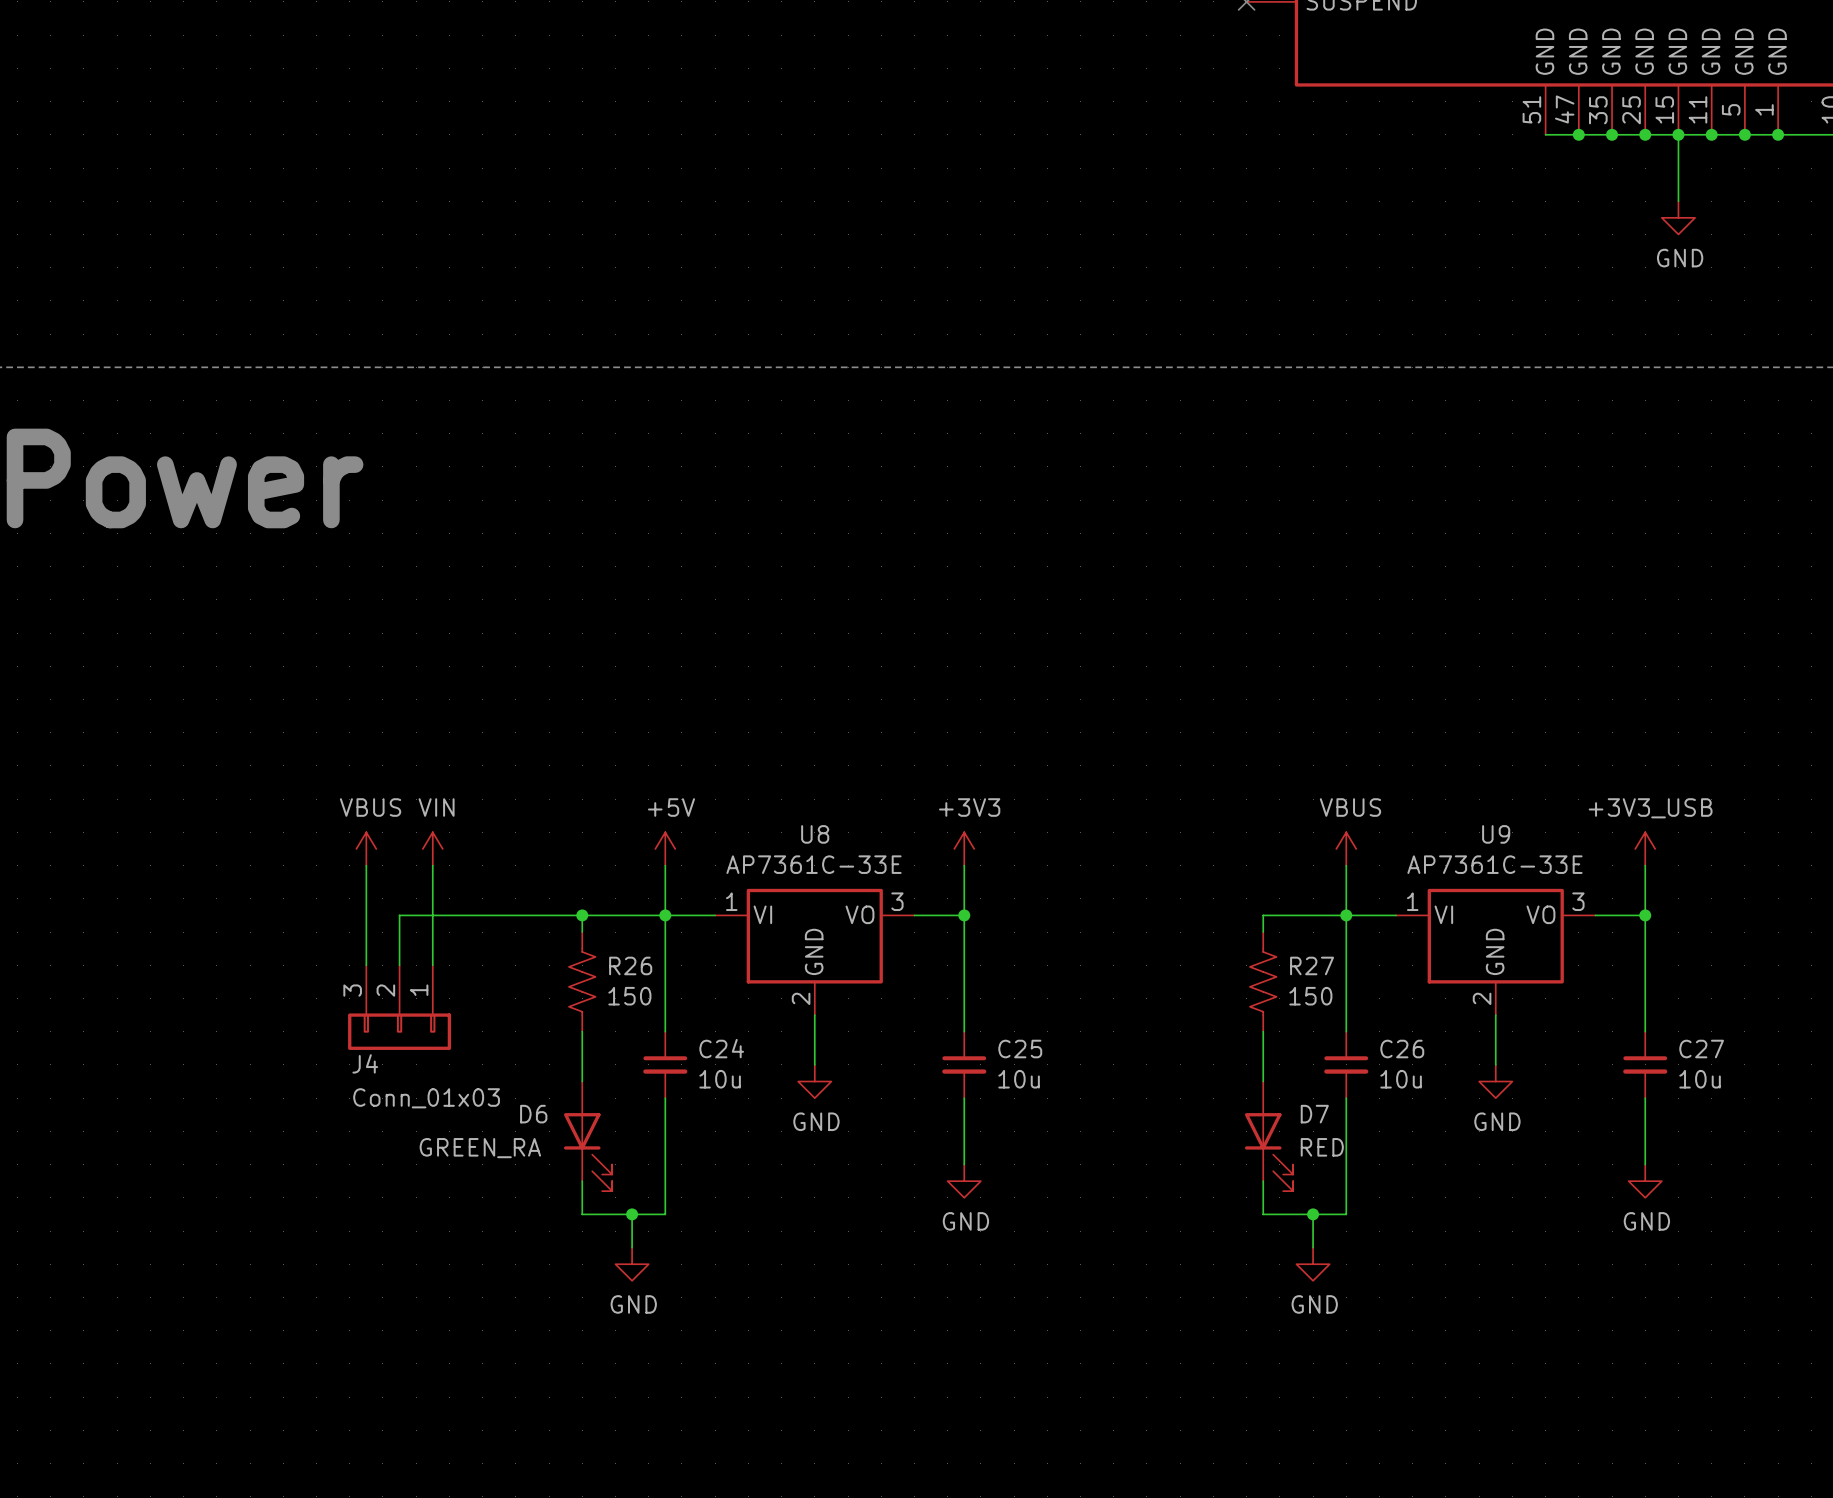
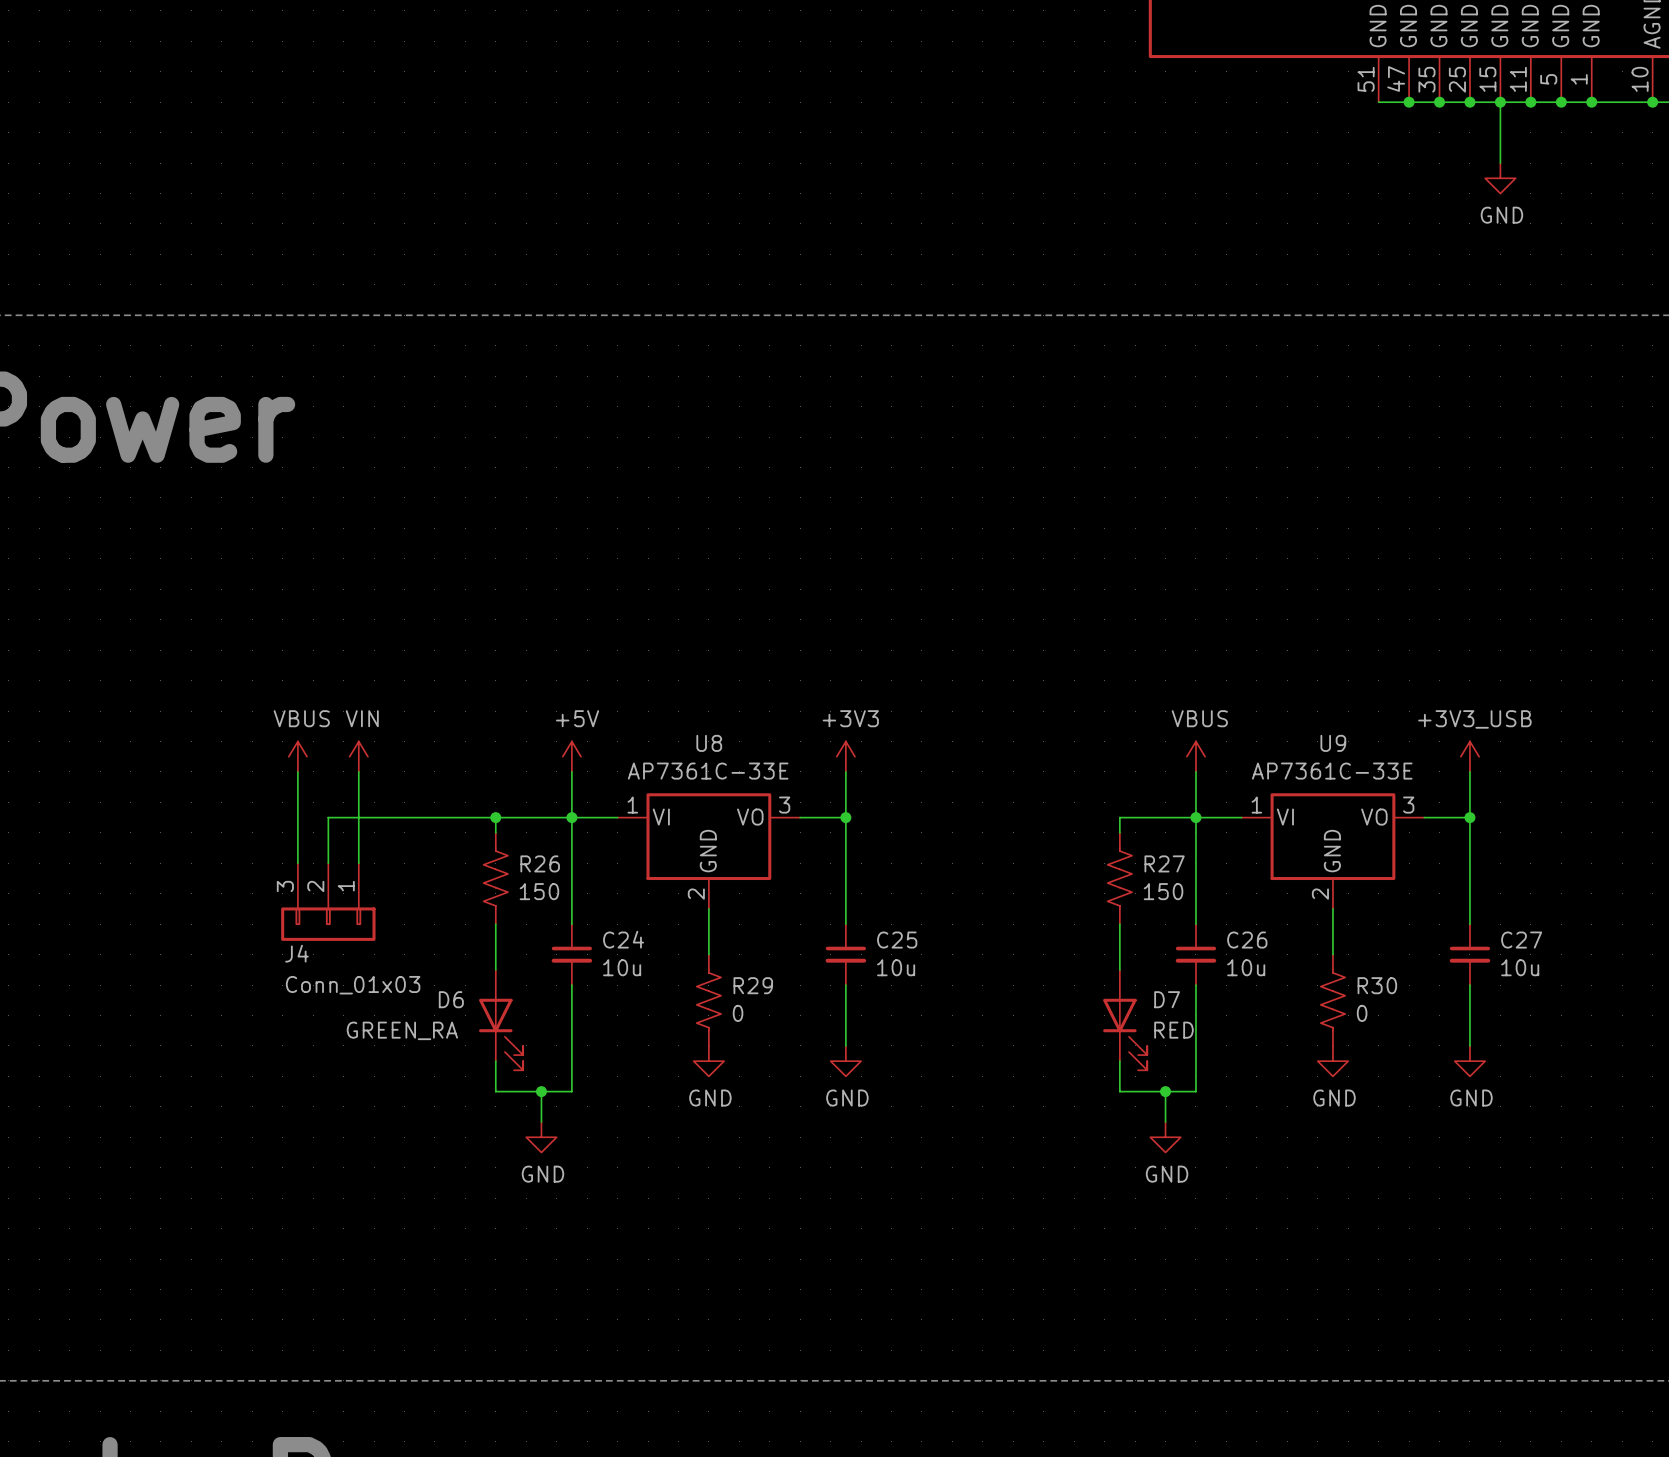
power symbol position: GND (814, 1081) -> GND (708, 1061)
power symbol position: GND (1495, 1081) -> GND (1332, 1061)
R29: none -> 0 (708, 1000)
R30: none -> 0 (1332, 1000)

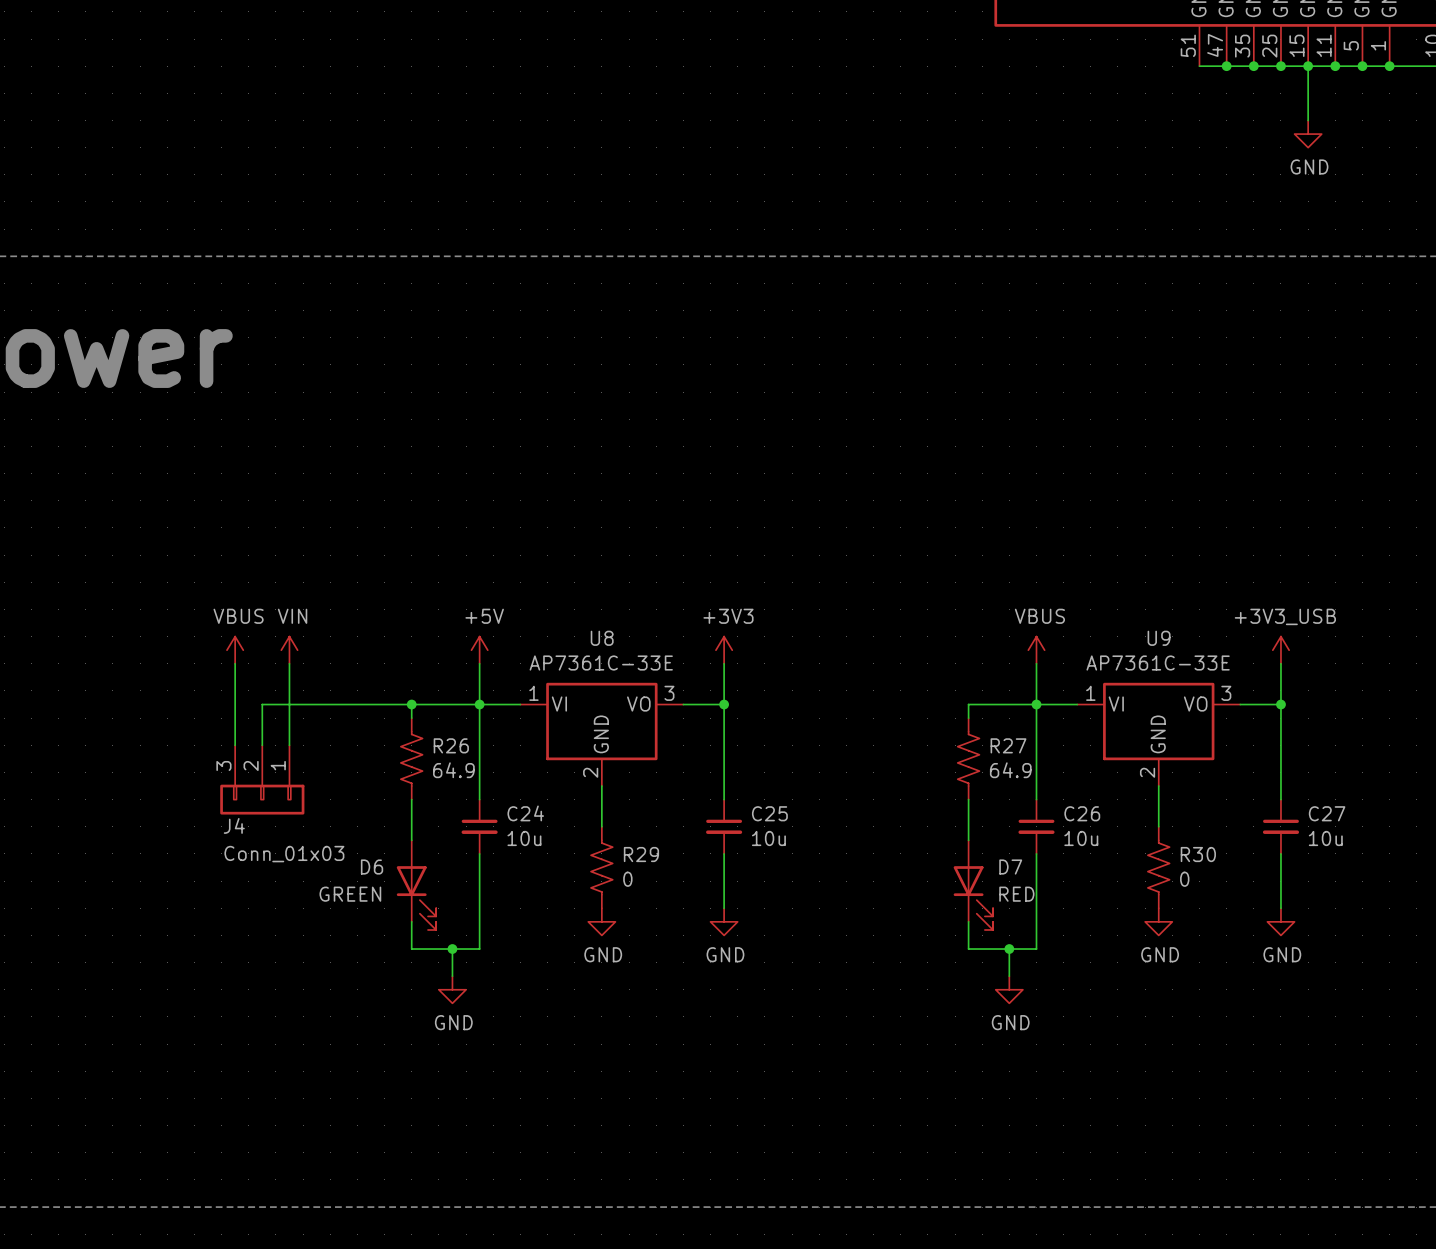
R26 value: 150 (539, 891) -> 64.9 (453, 770)
R27 value: 150 (1163, 891) -> 64.9 (1010, 770)
D6 value: GREEN_RA (402, 1030) -> GREEN (350, 894)

